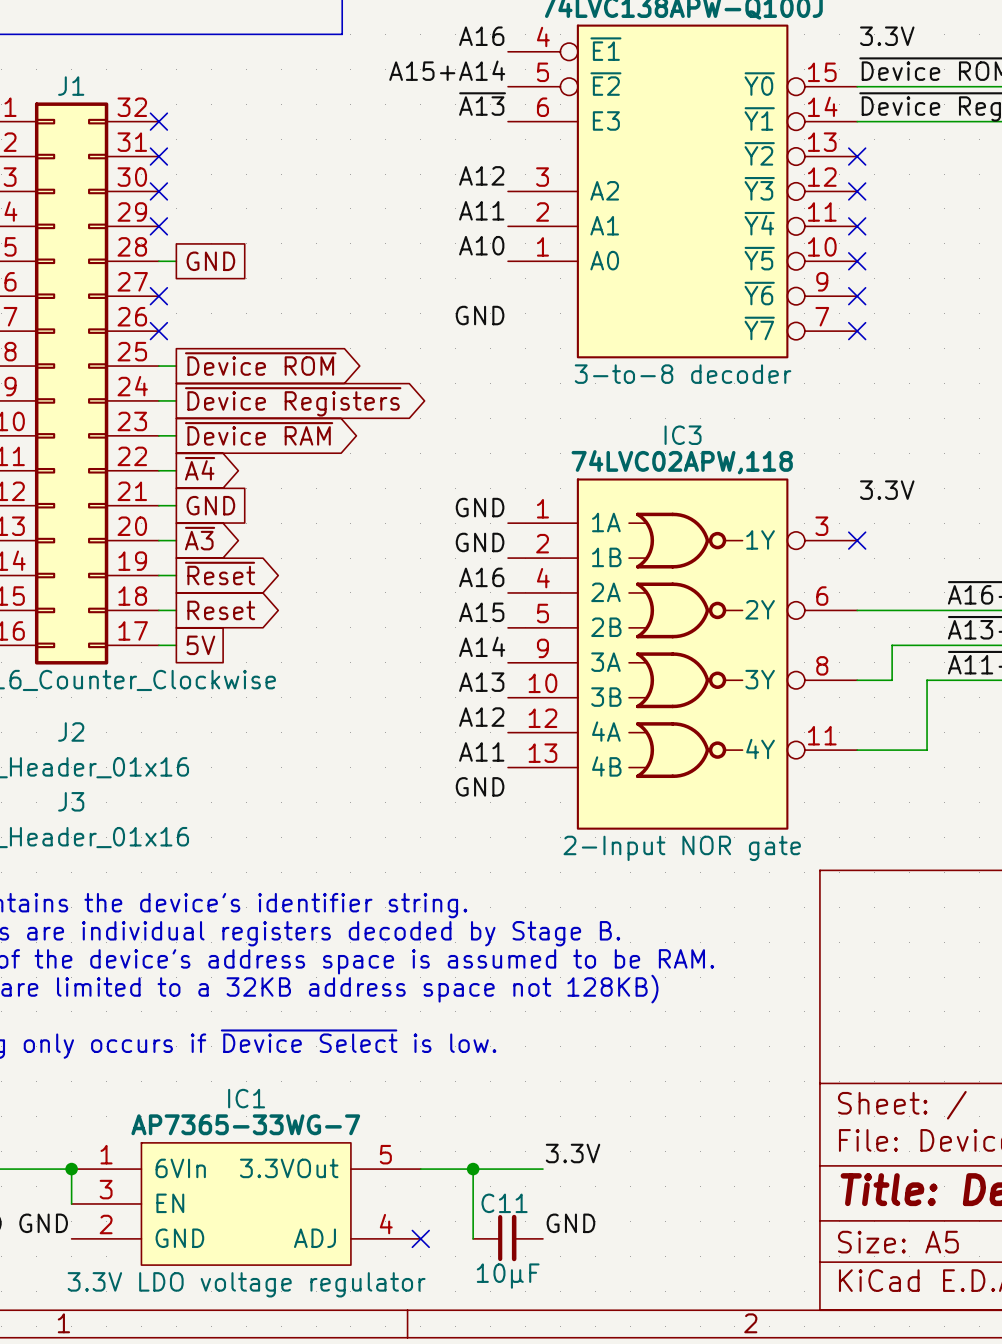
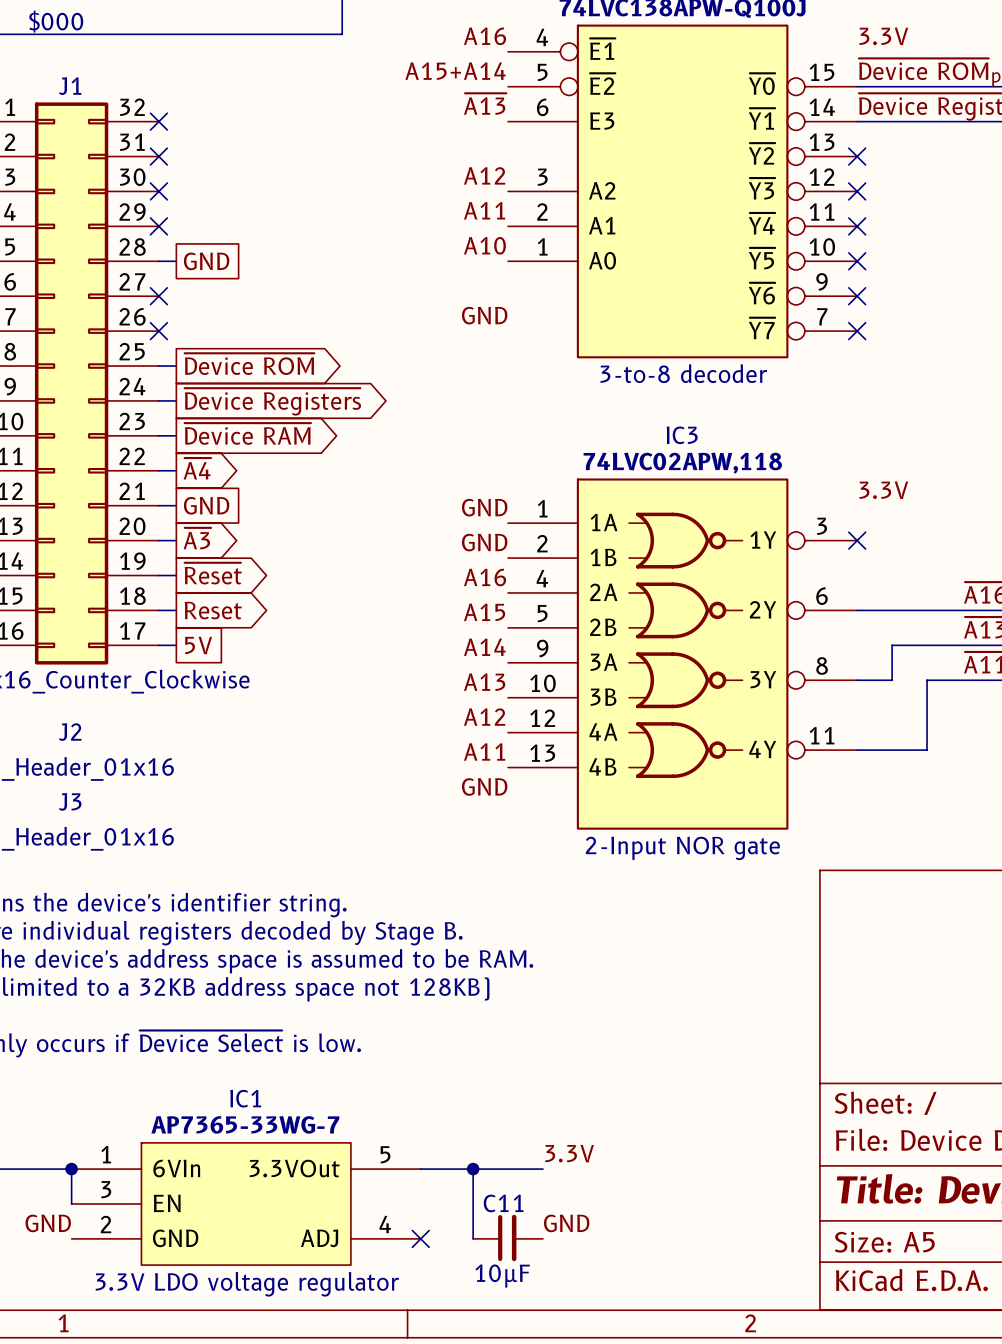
text: none -> $000 (56, 21)

